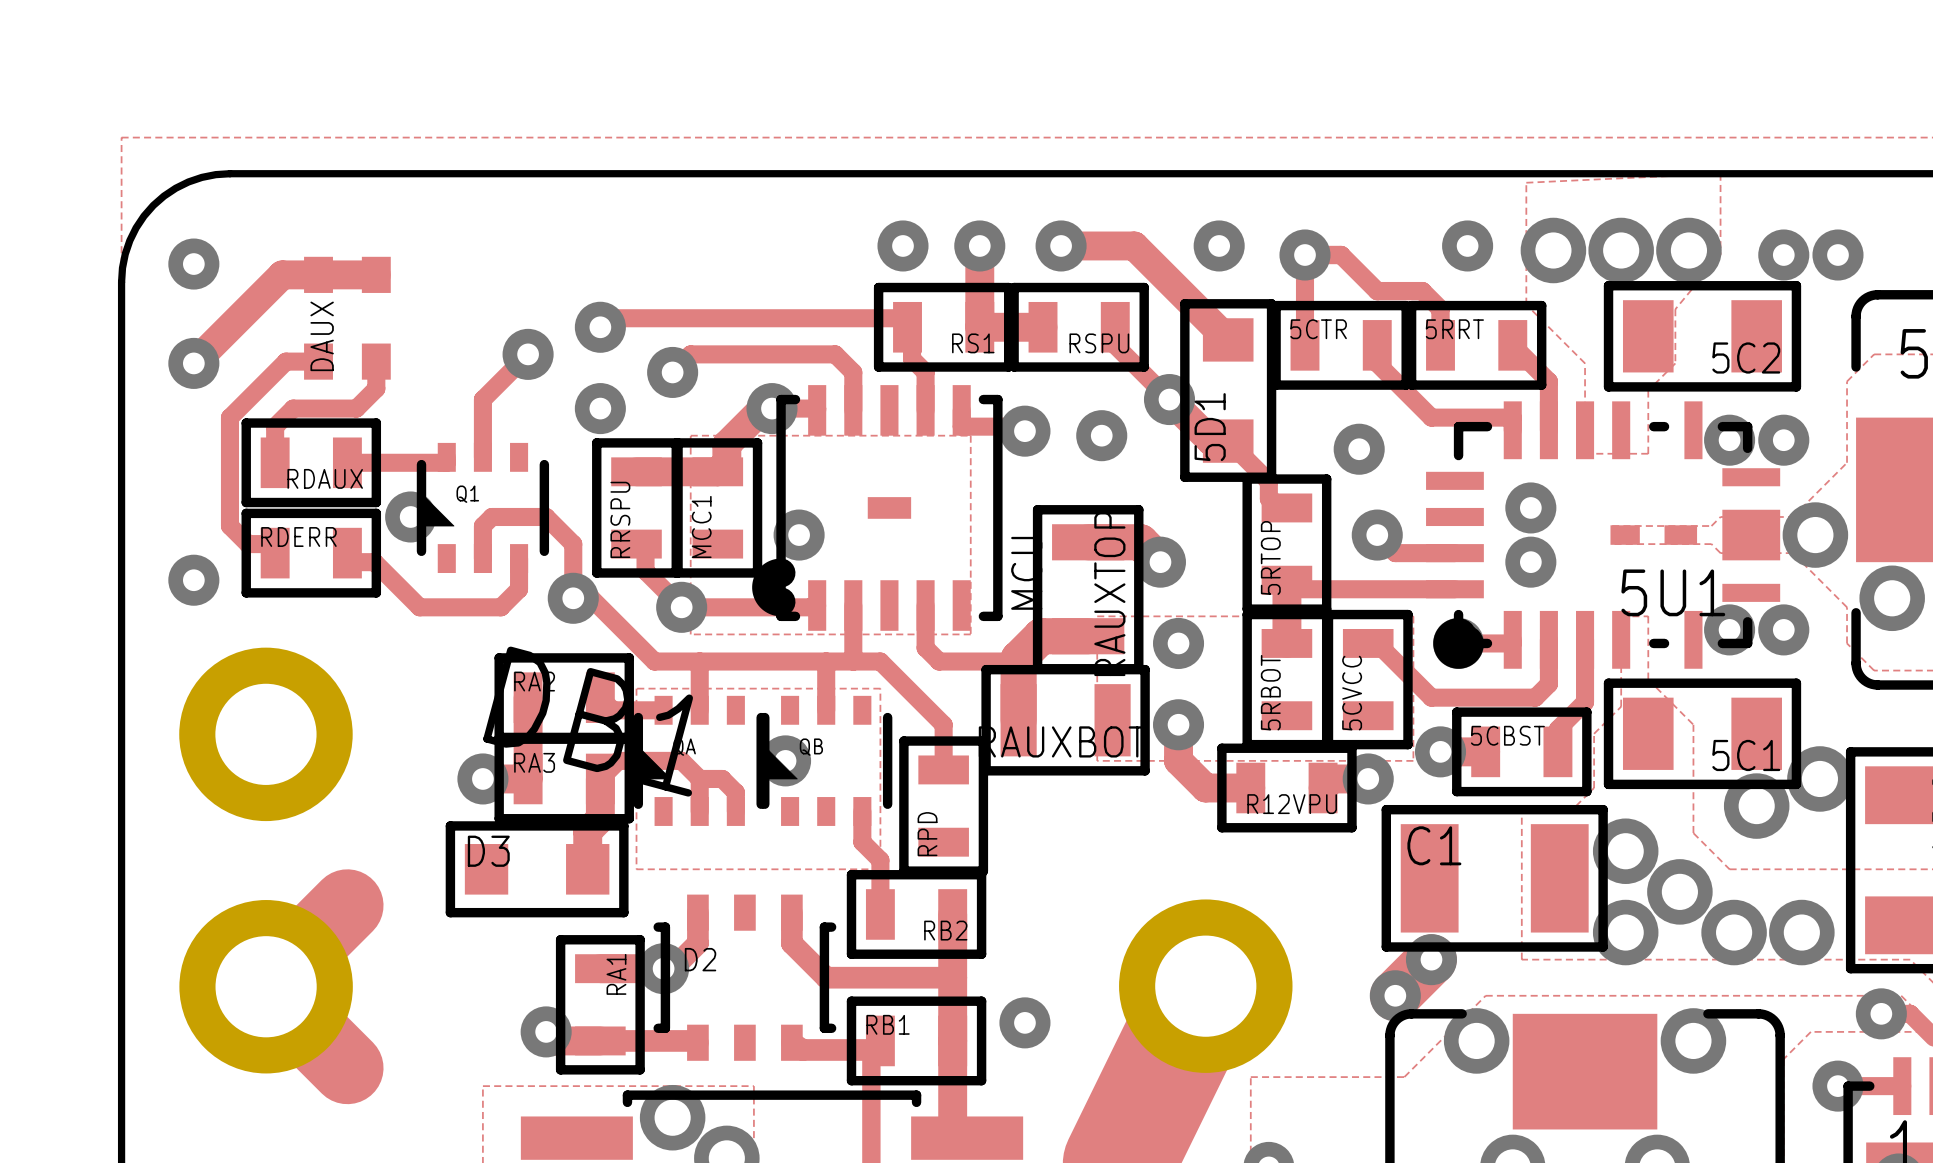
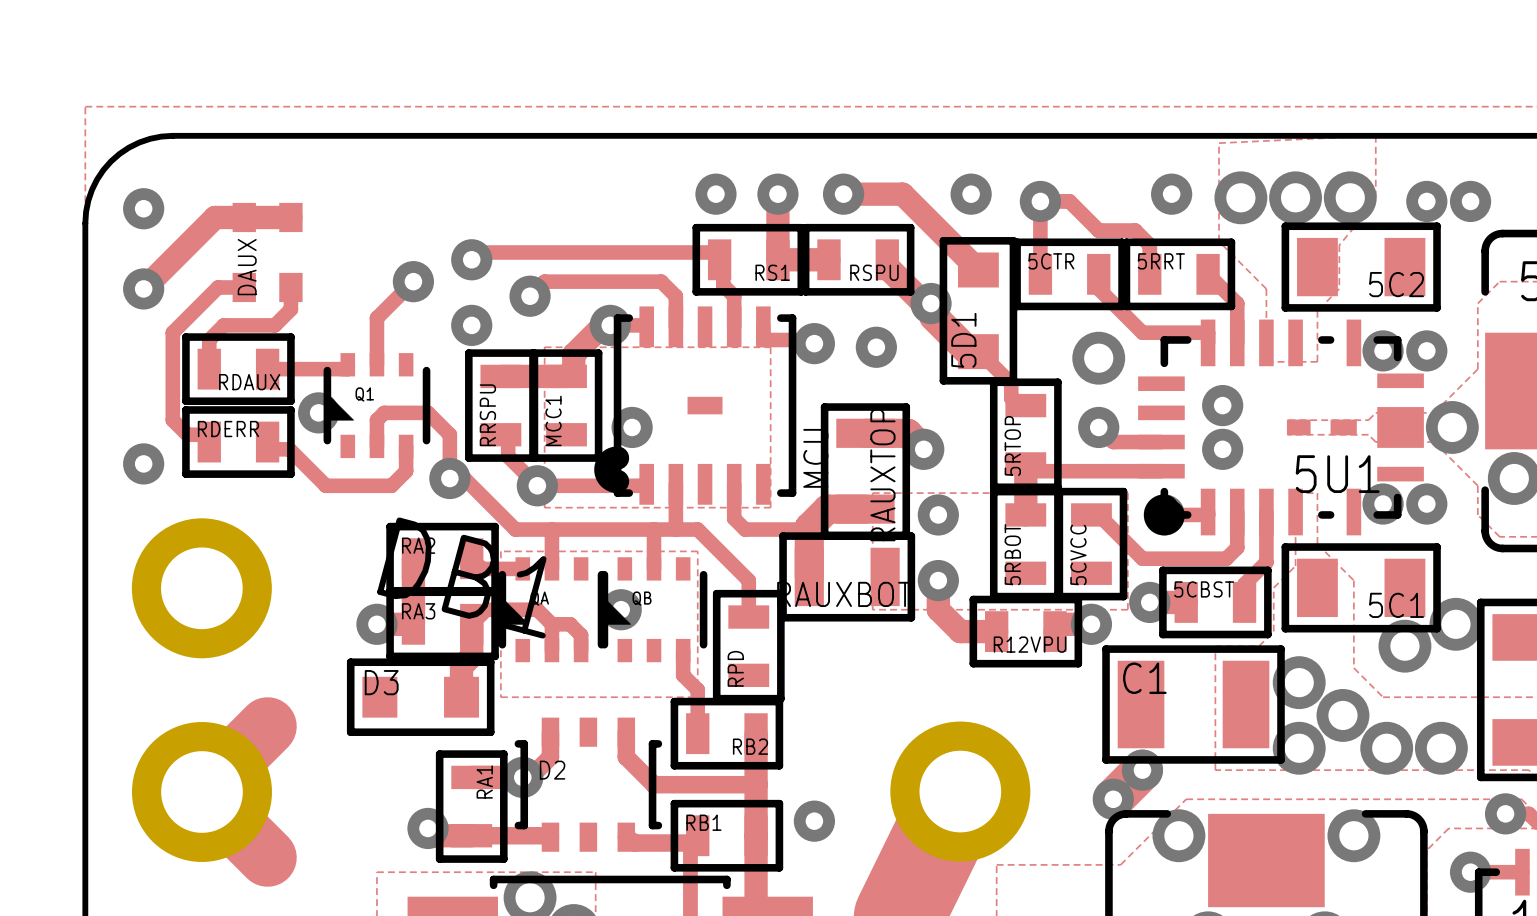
via position: (1169, 399) -> (931, 303)
via size: [1333, 423, 1385, 475] -> [1072, 331, 1126, 385]

